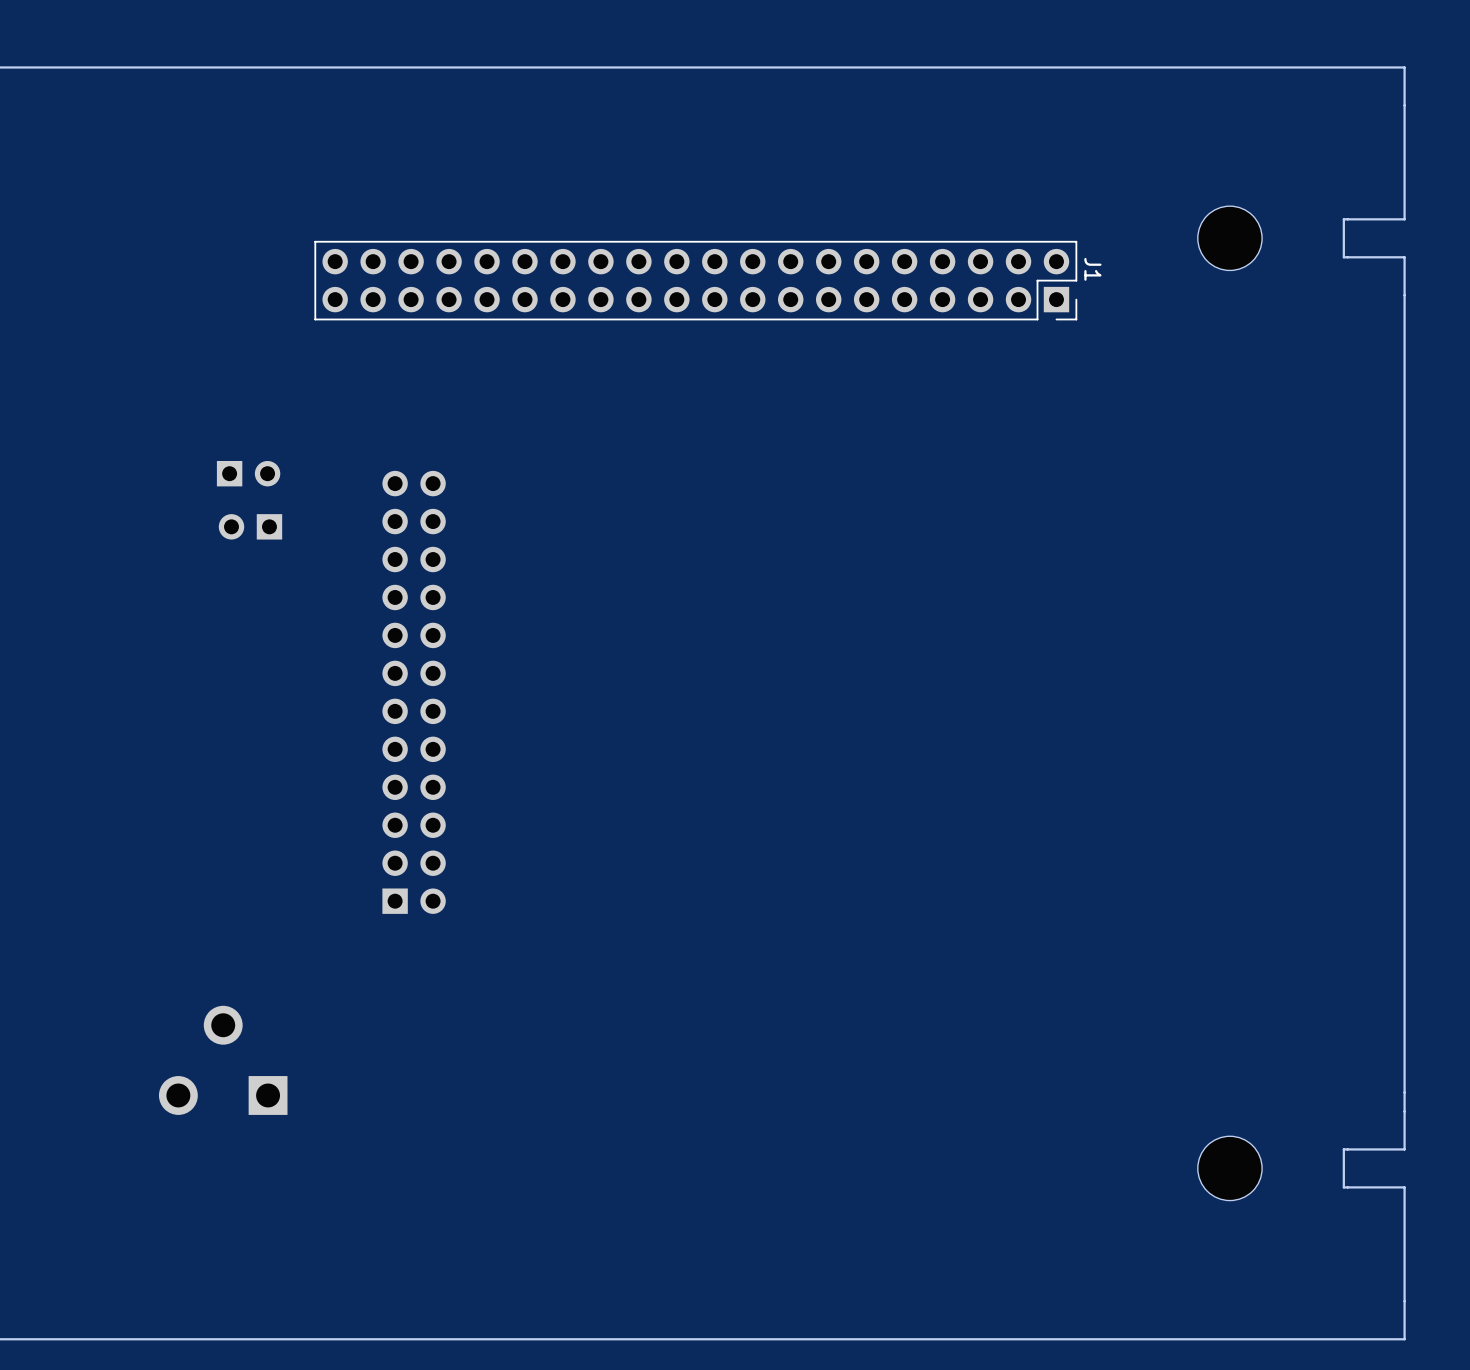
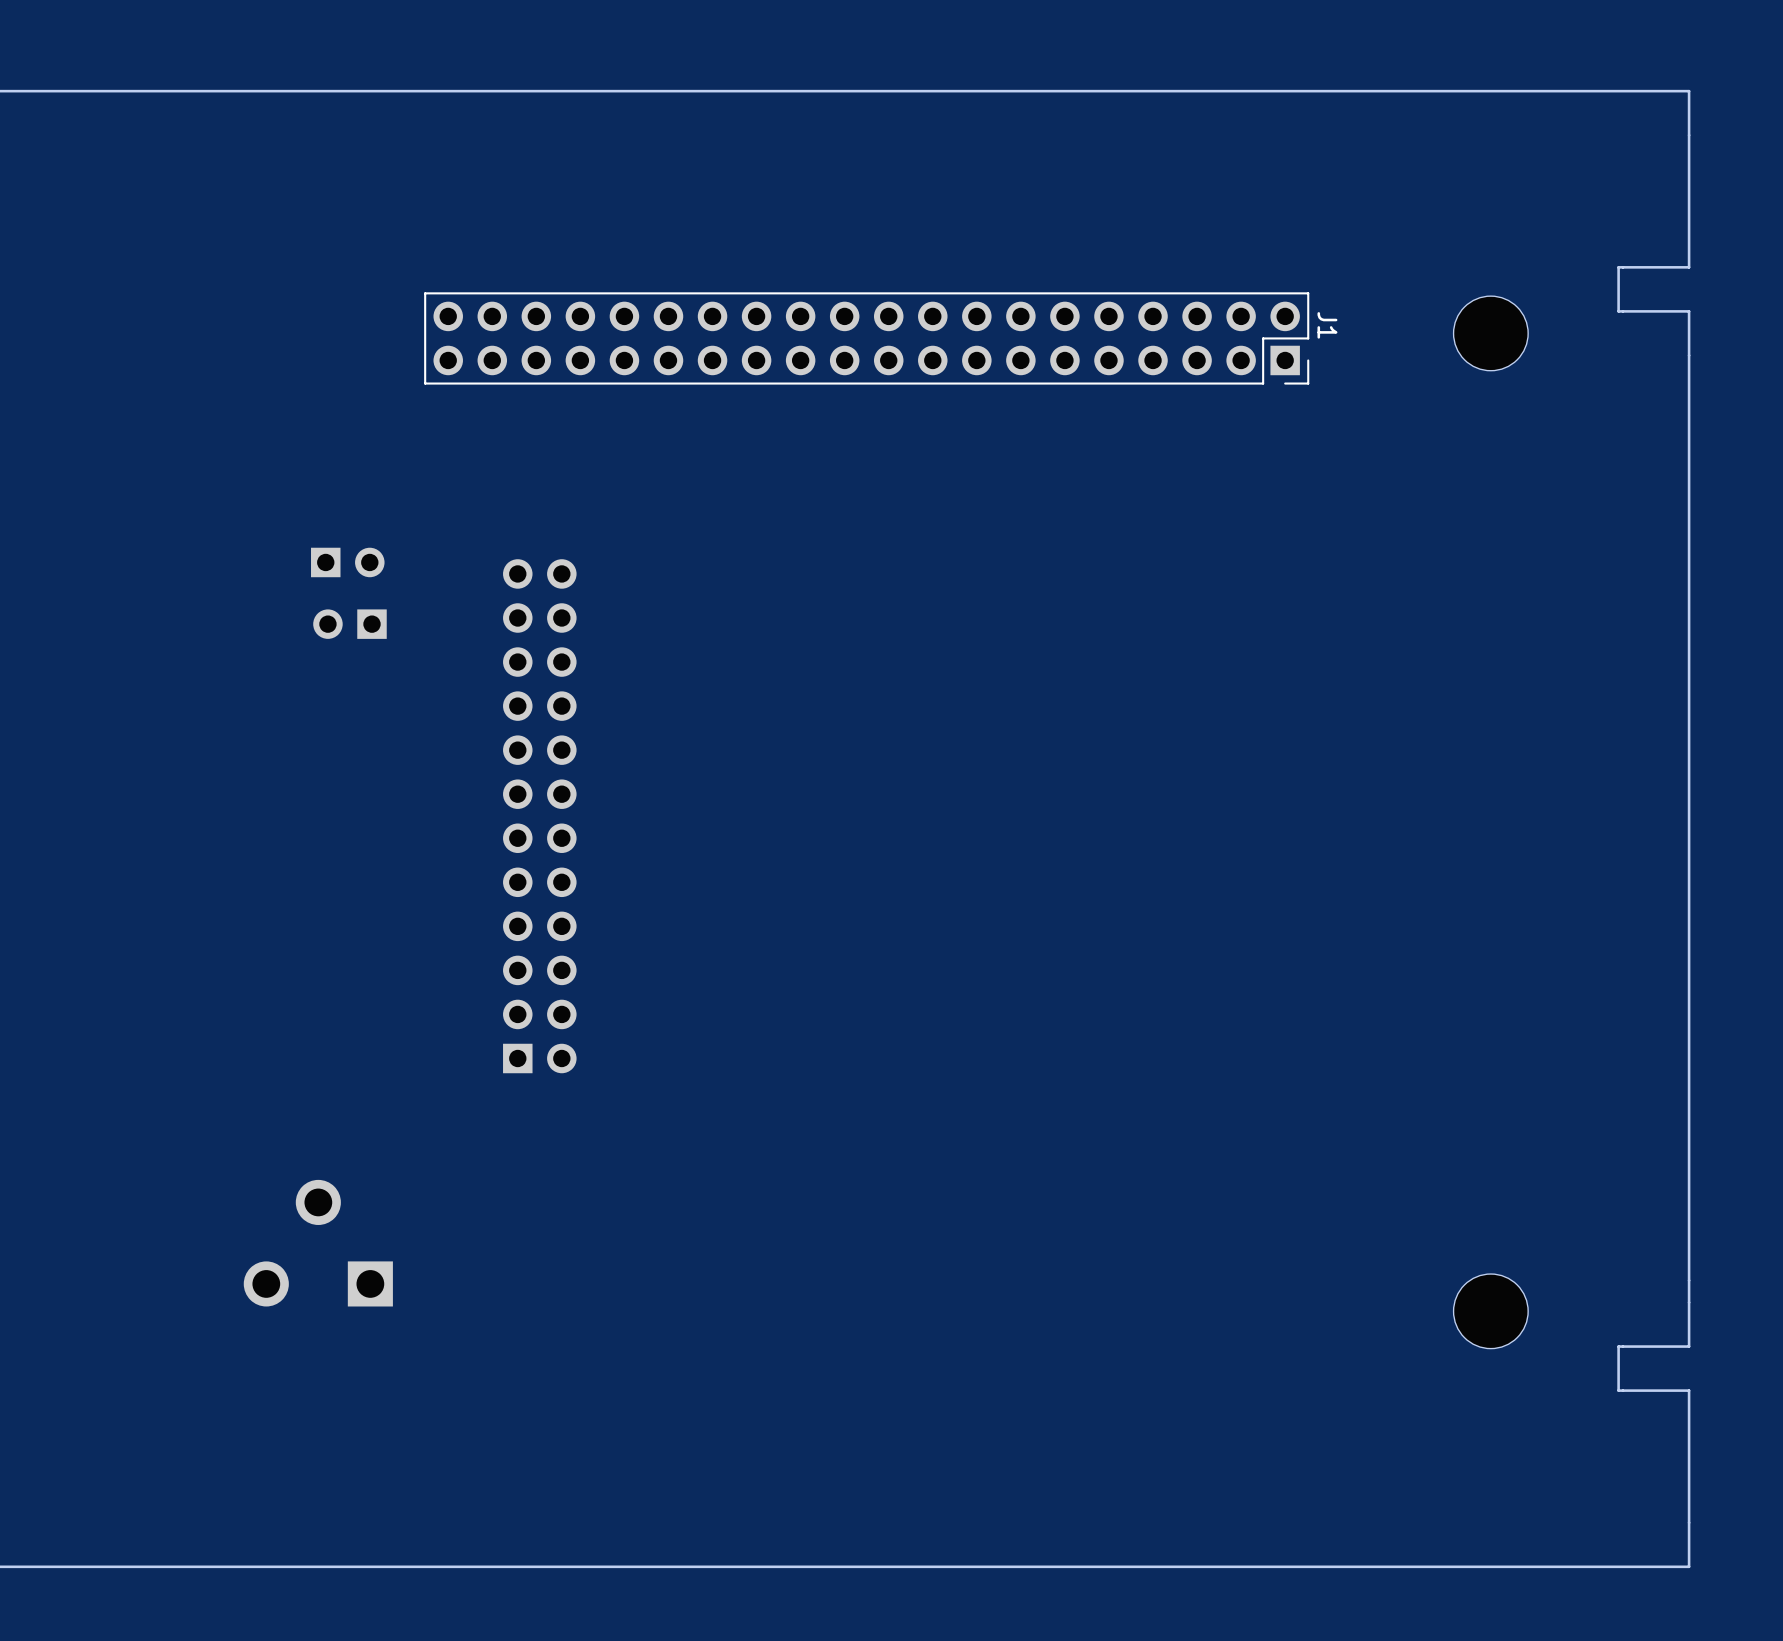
part position: (1229, 238) -> (1490, 333)
part position: (1229, 1168) -> (1490, 1311)

